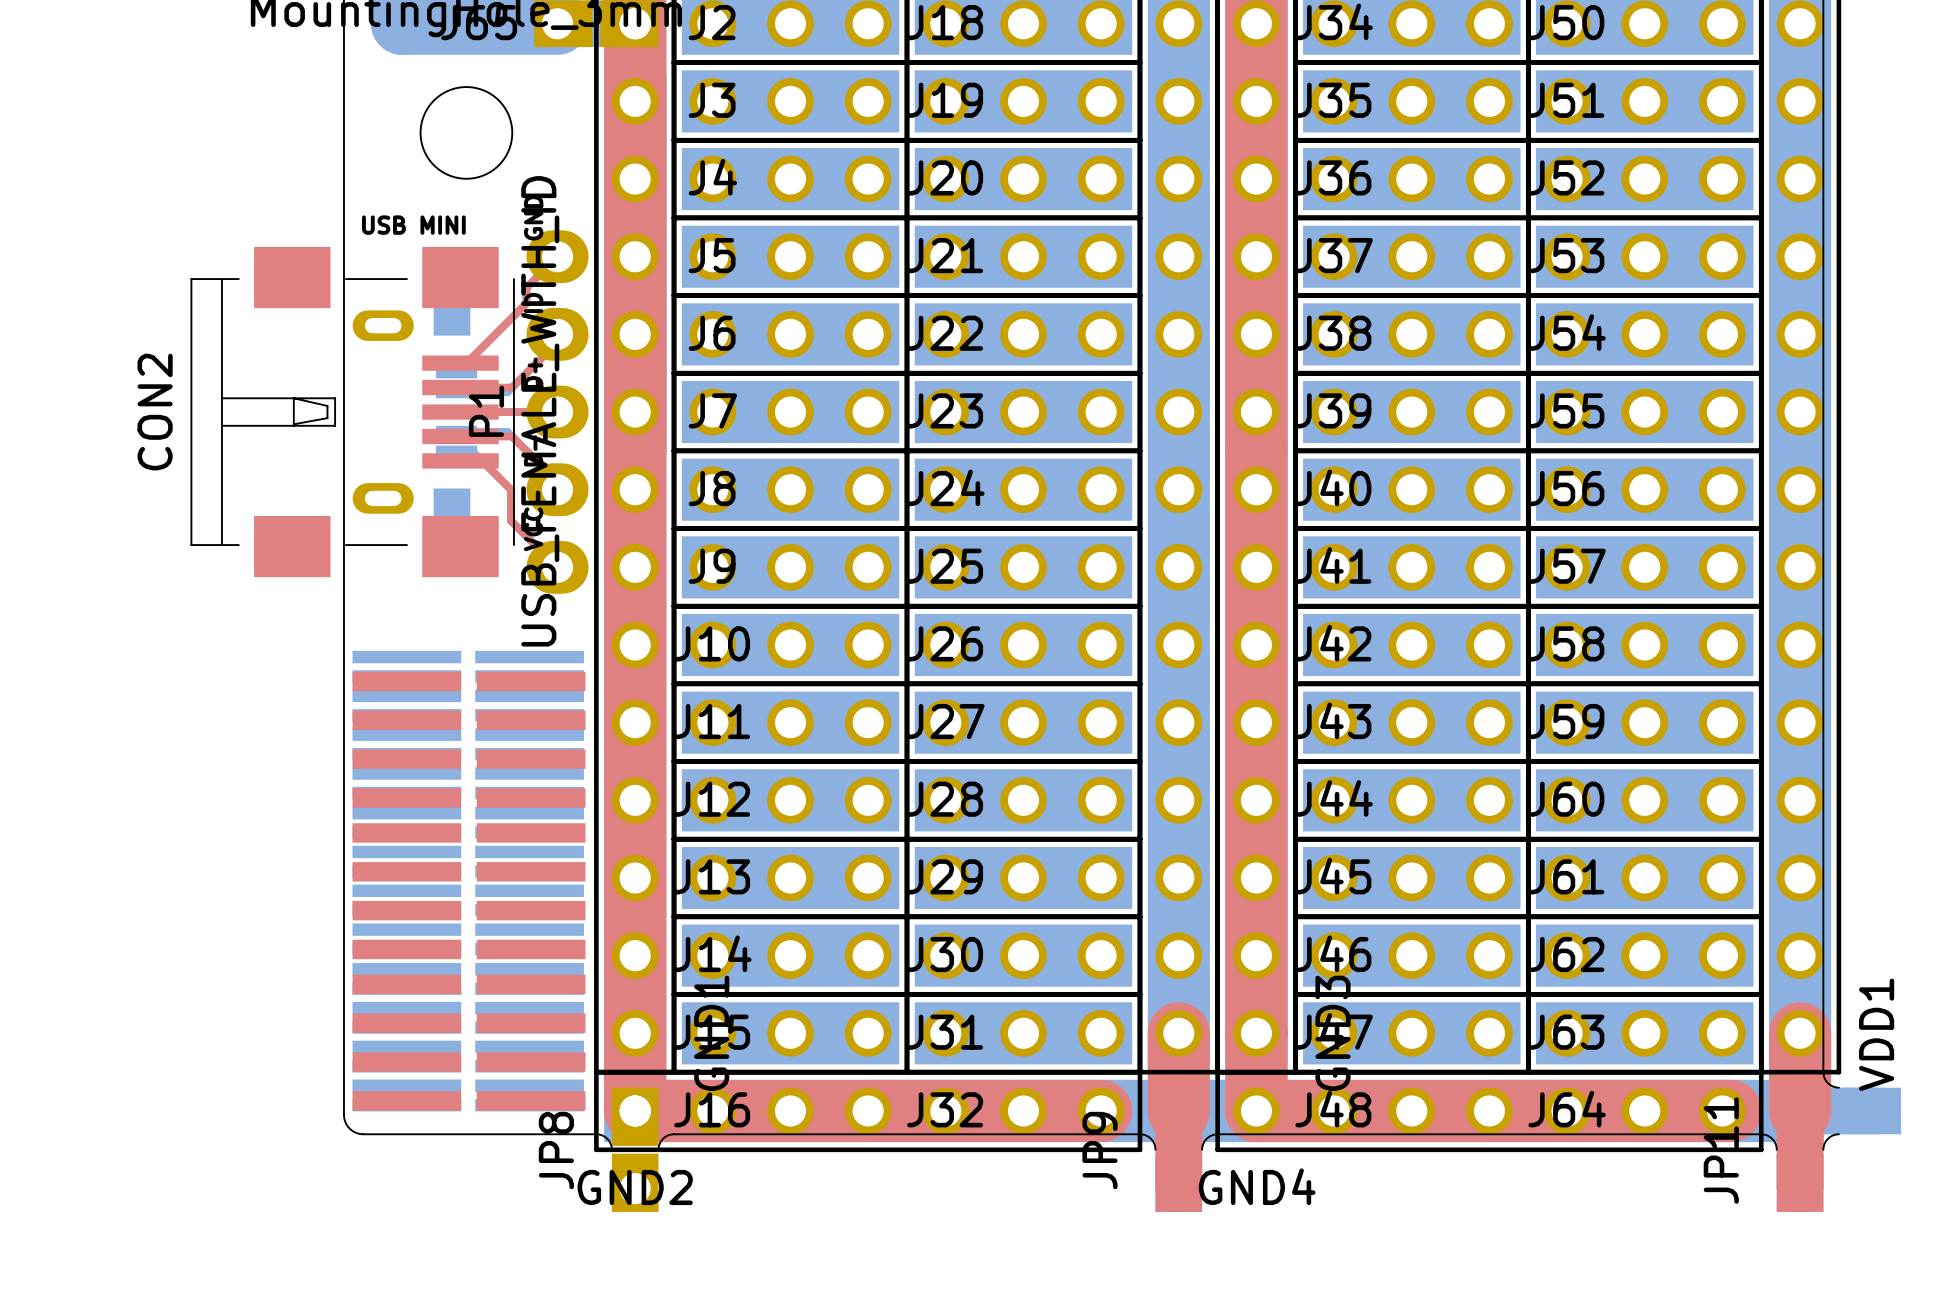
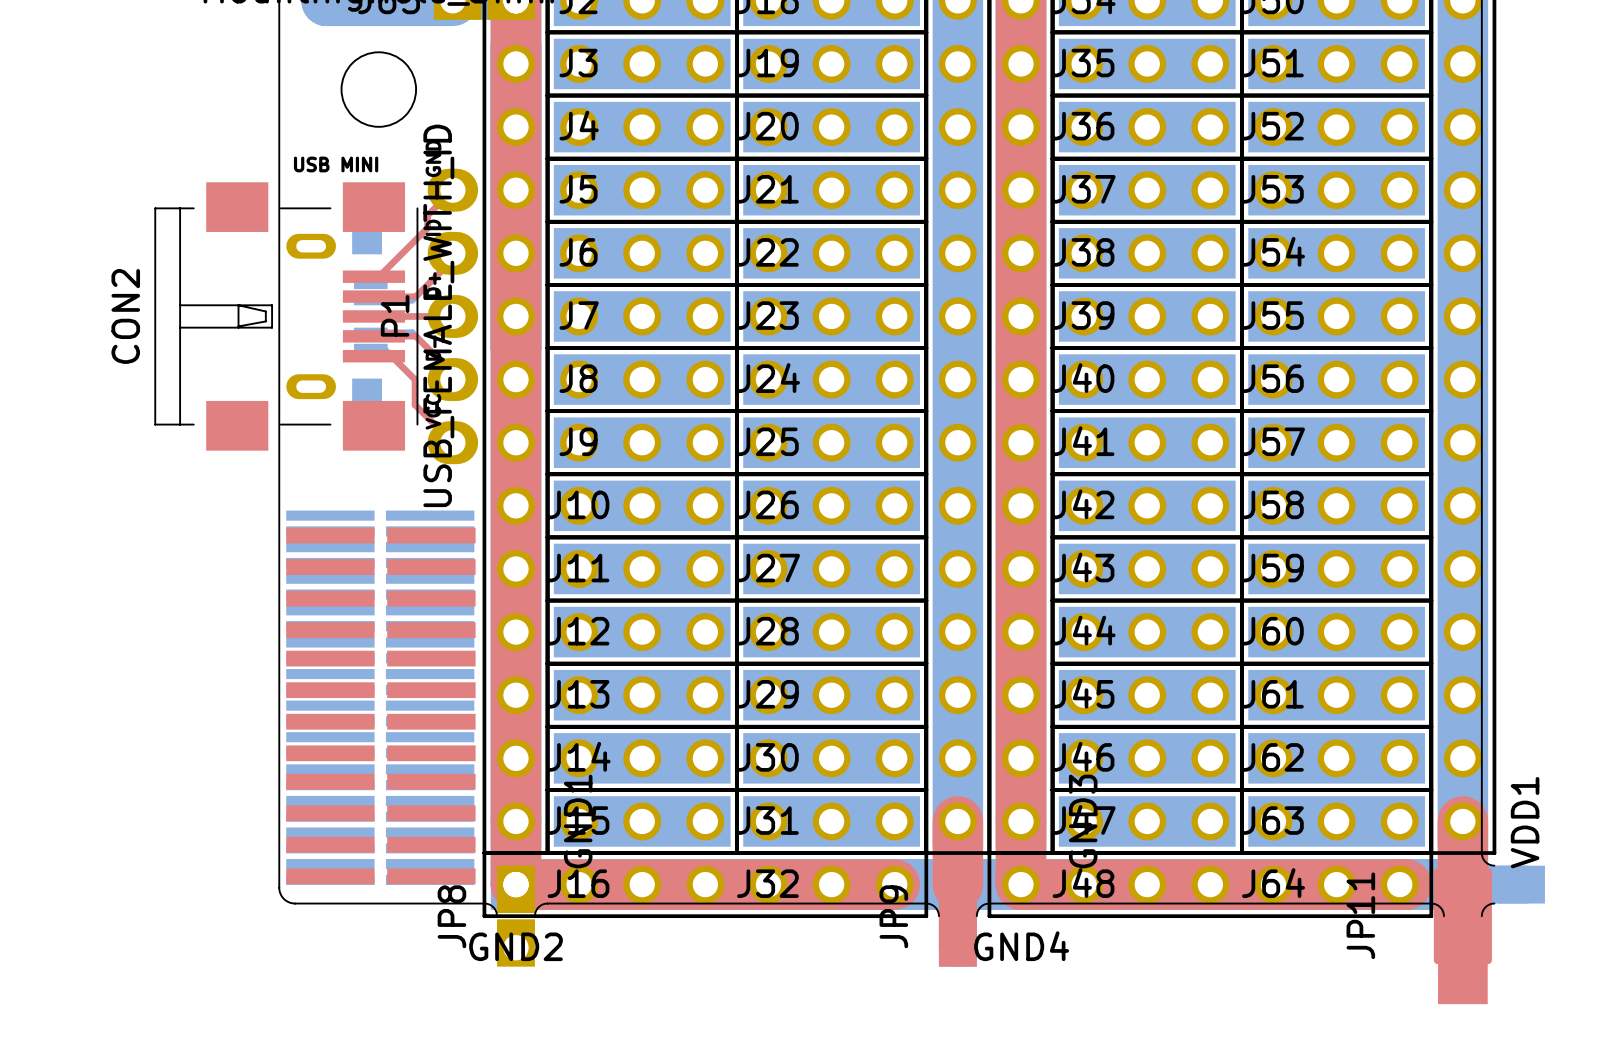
JP11 footprint: [1776, 1087, 1824, 1212] -> [1433, 828, 1492, 1005]

